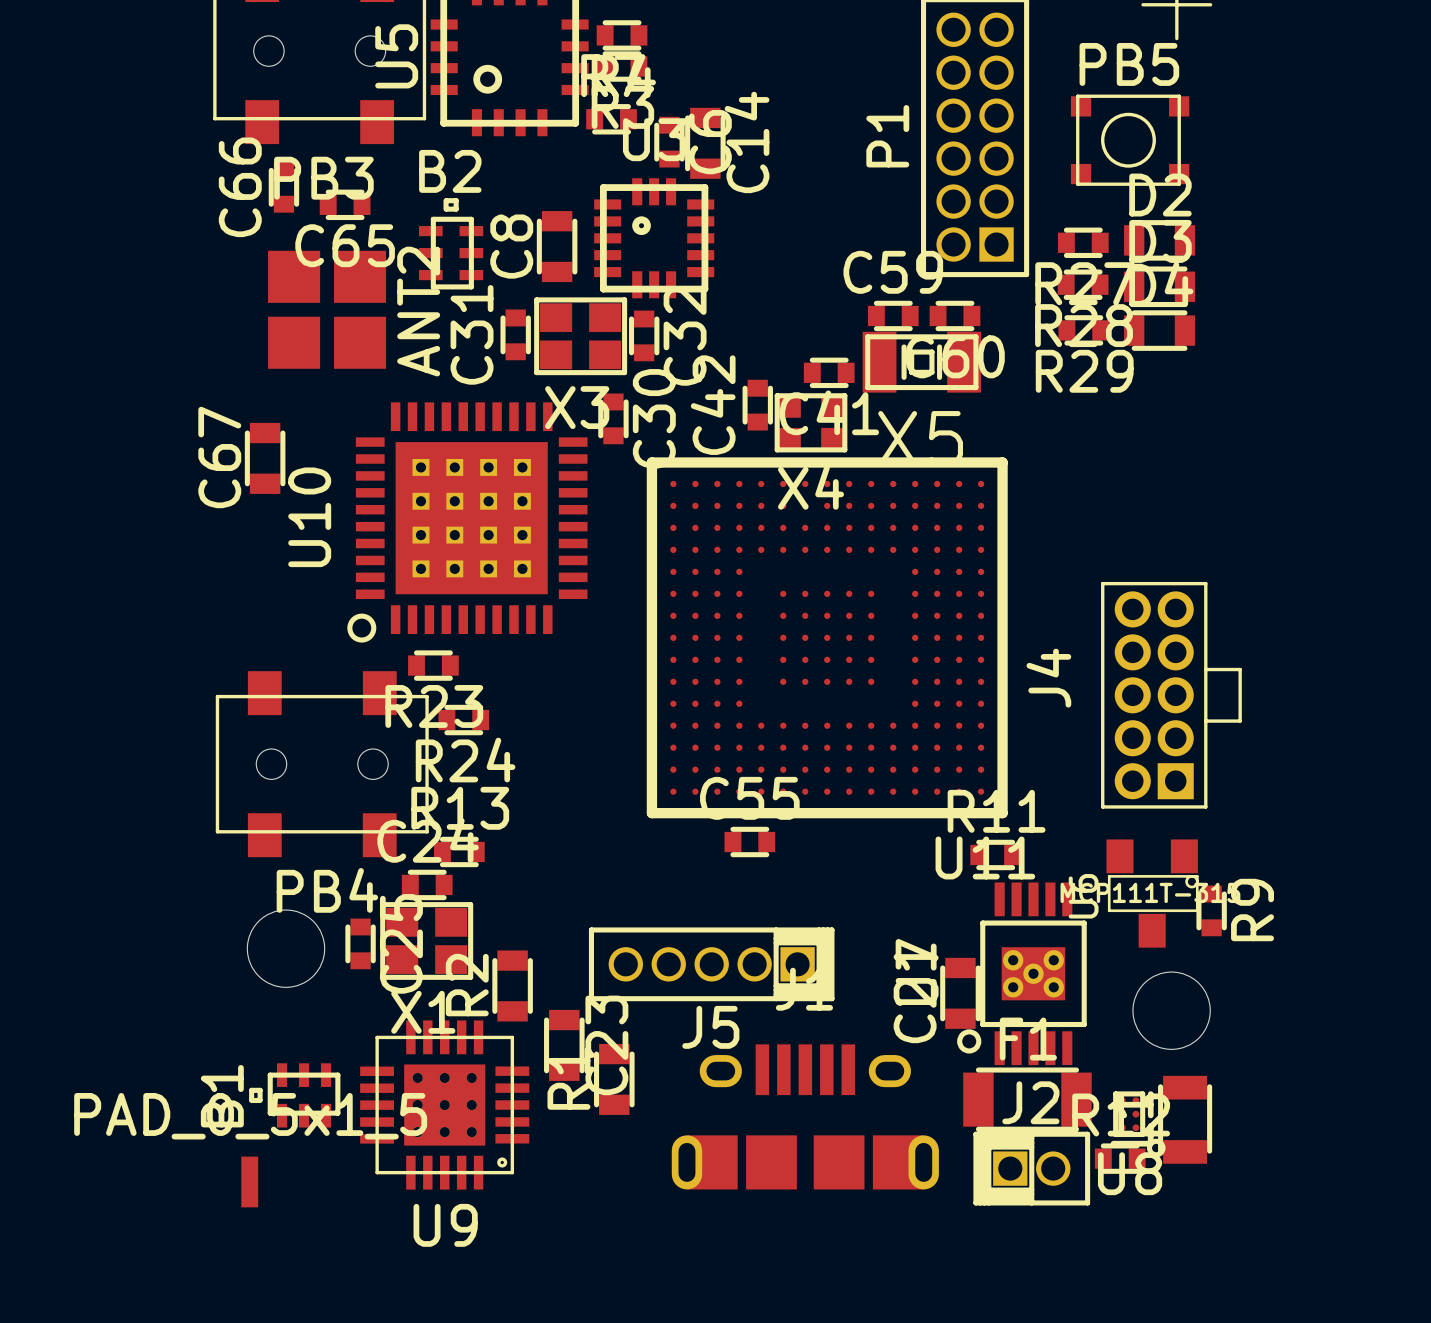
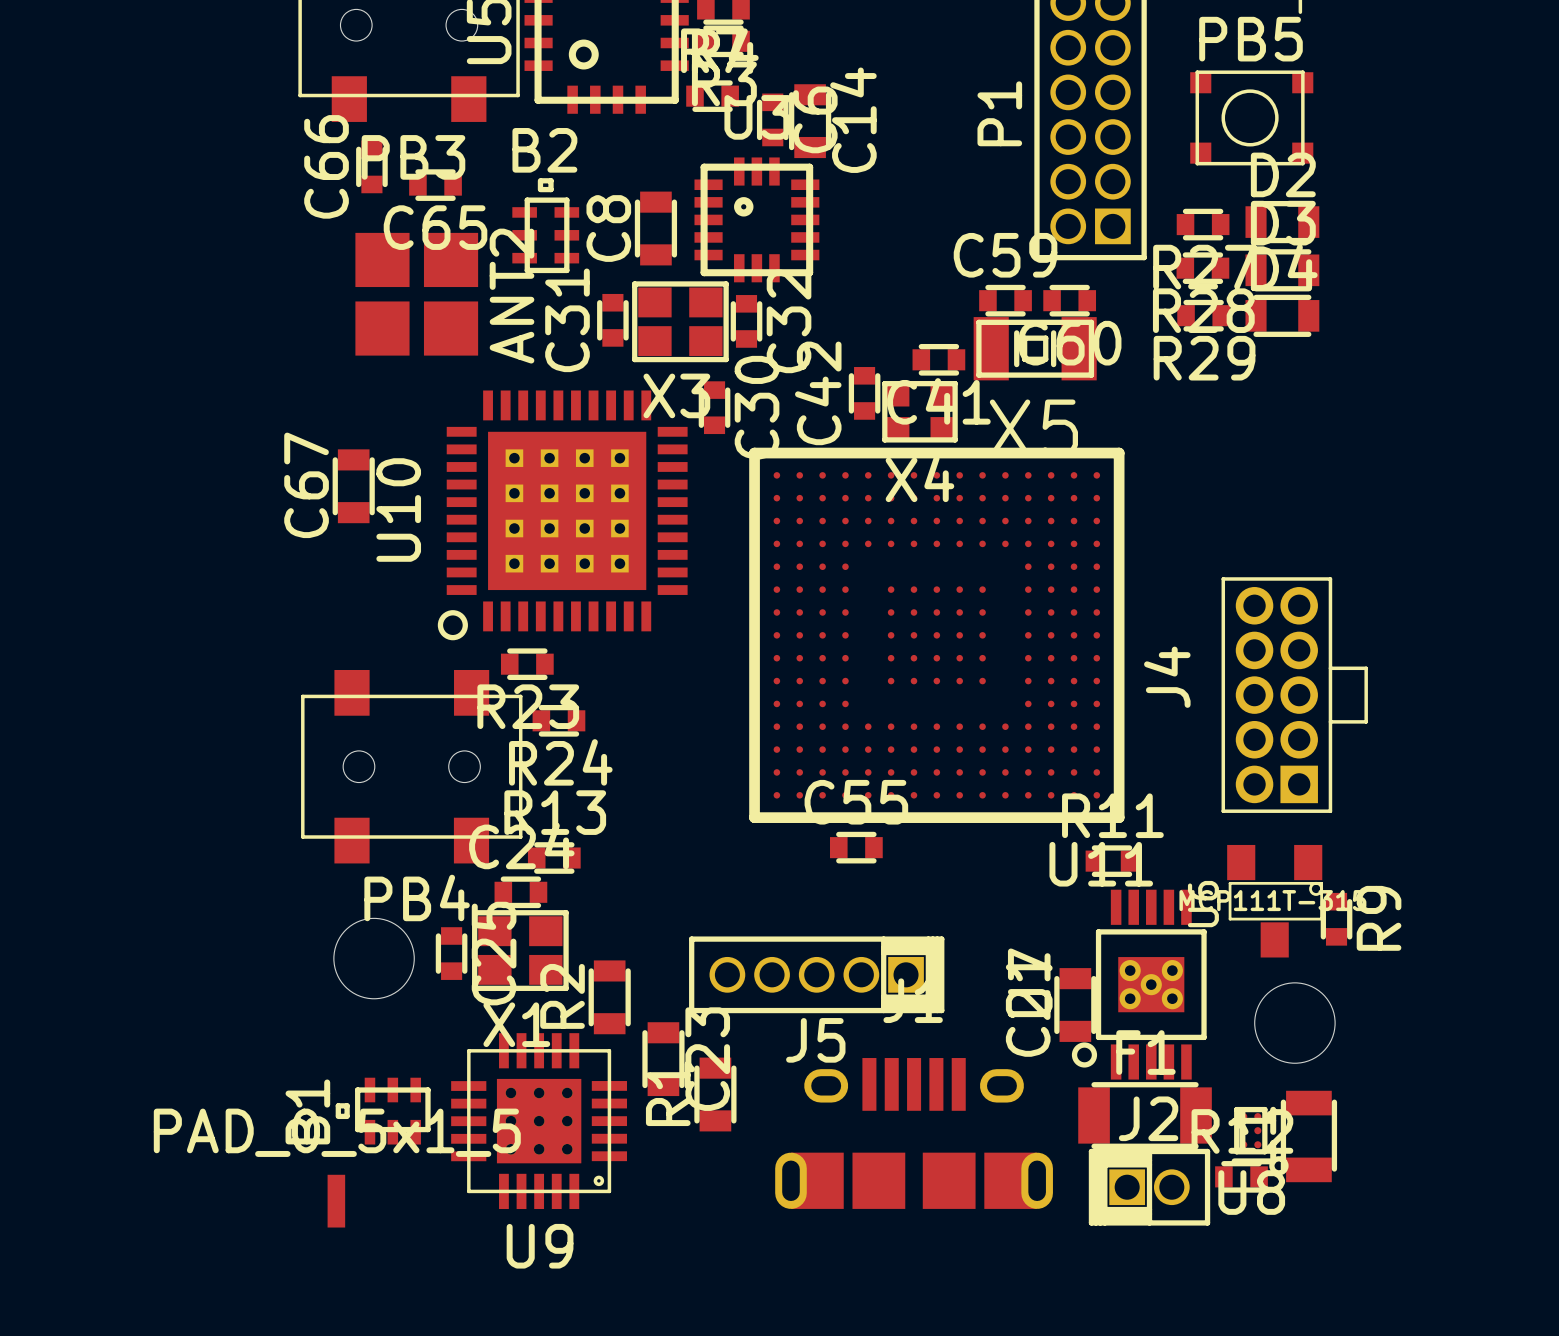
C67 position: (265, 458) -> (353, 486)

